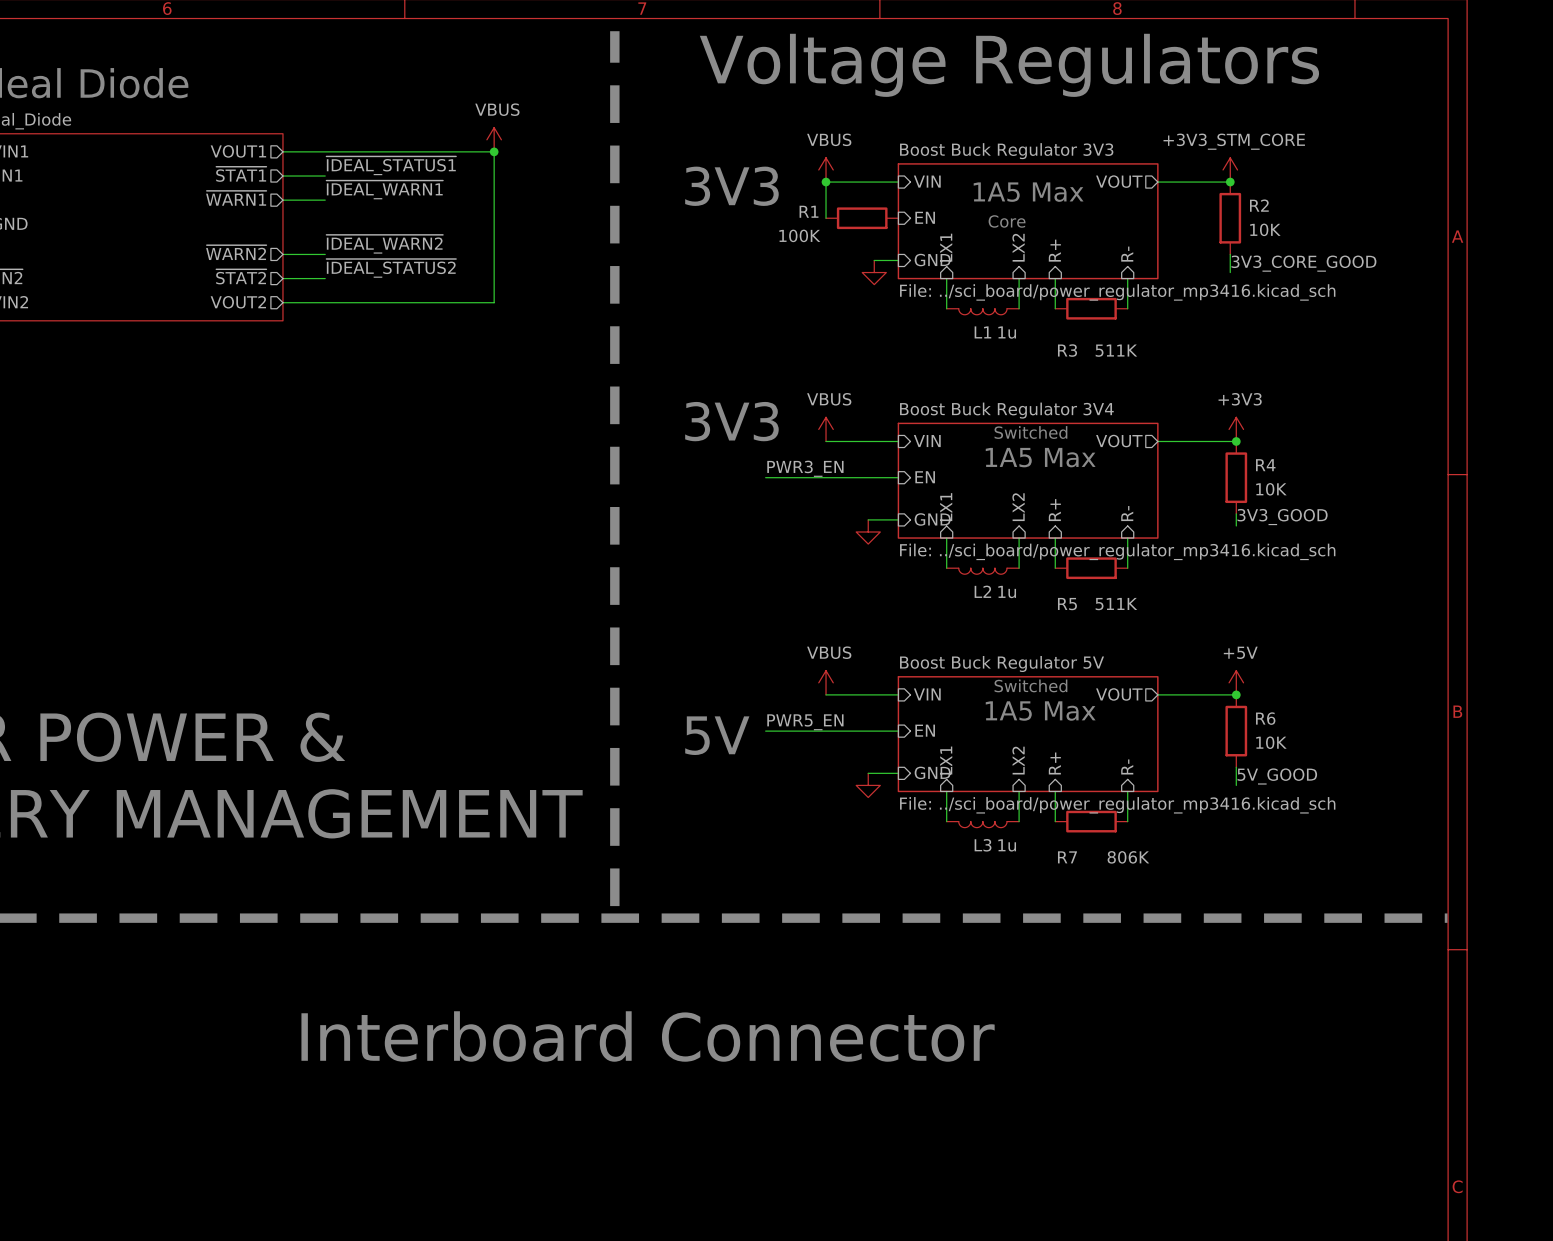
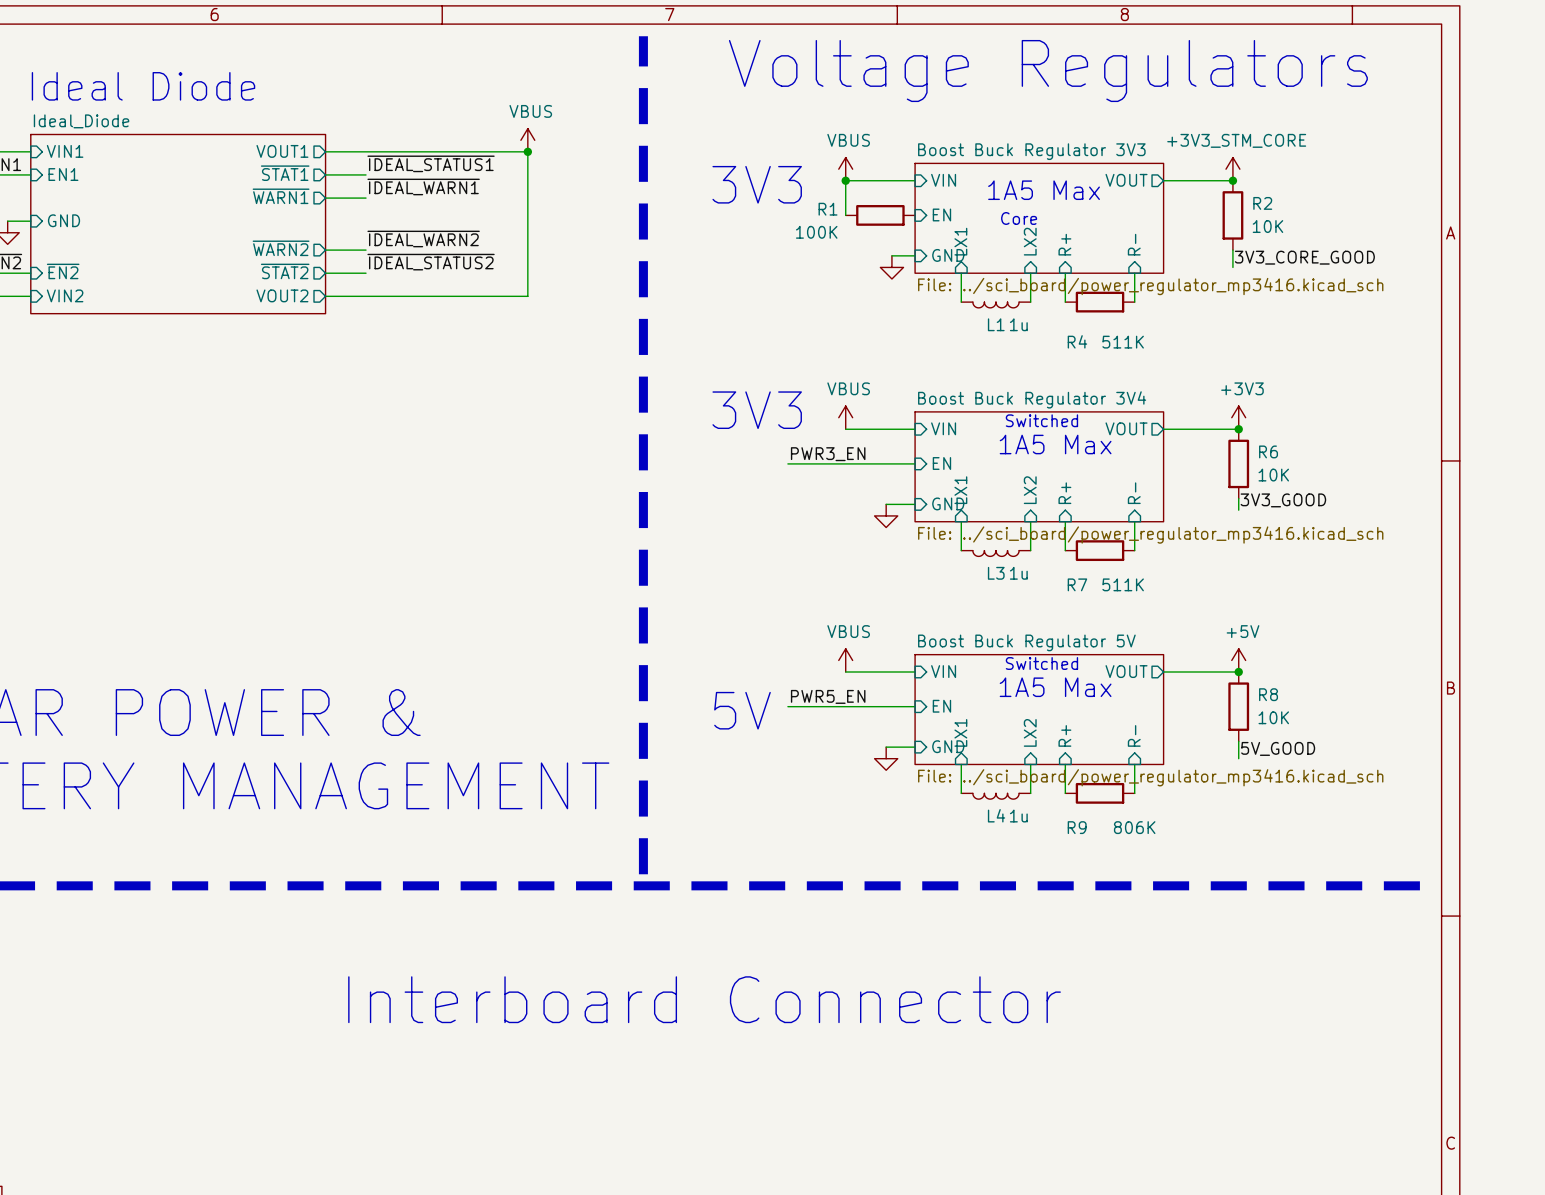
R3 name: R3 (1067, 350) -> R4 (1077, 341)
R4 name: R4 (1265, 465) -> R6 (1268, 451)
L2 name: L2 (982, 591) -> L3 (996, 573)
R5 name: R5 (1067, 604) -> R7 (1077, 584)
R6 name: R6 (1265, 718) -> R8 (1268, 694)
L3 name: L3 (983, 845) -> L4 (996, 815)
R7 name: R7 (1067, 857) -> R9 (1077, 827)

